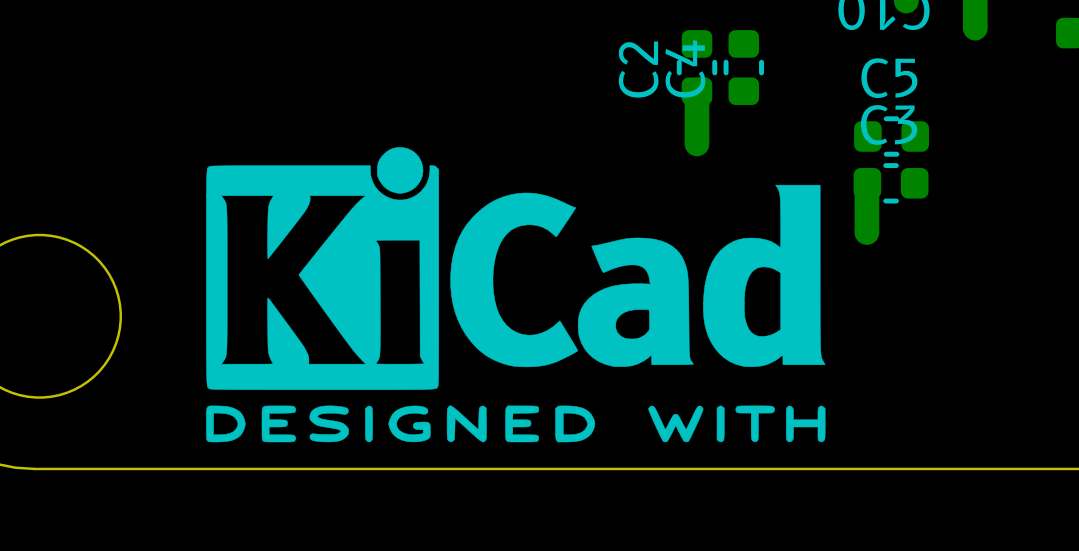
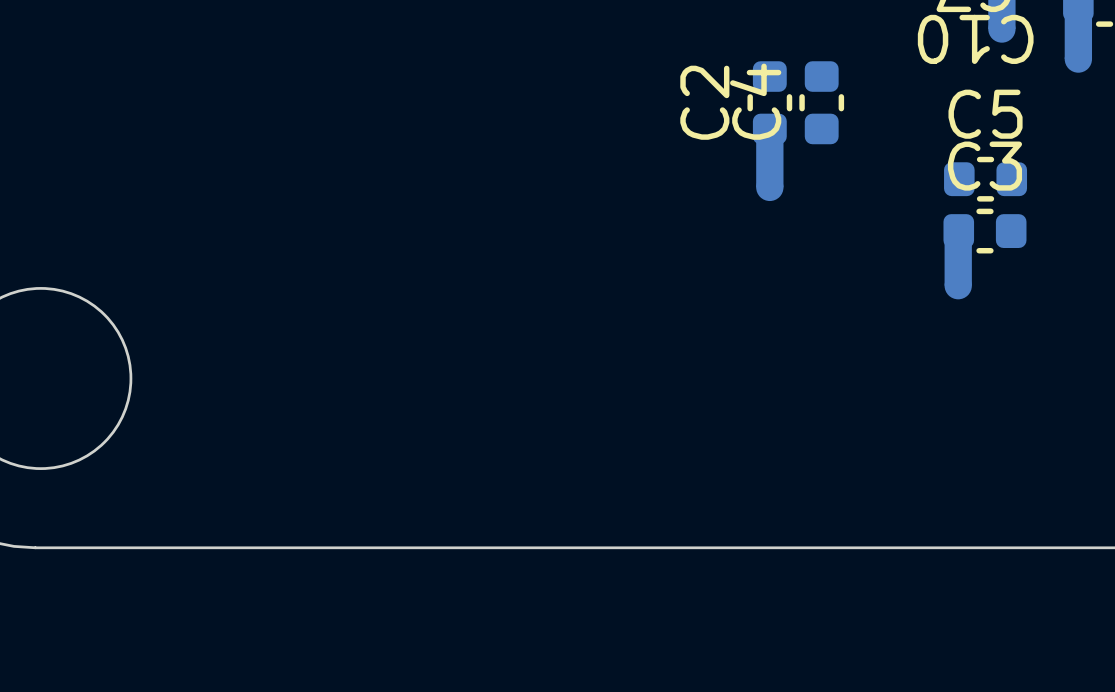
drawing: [206, 147, 826, 443] -> none

